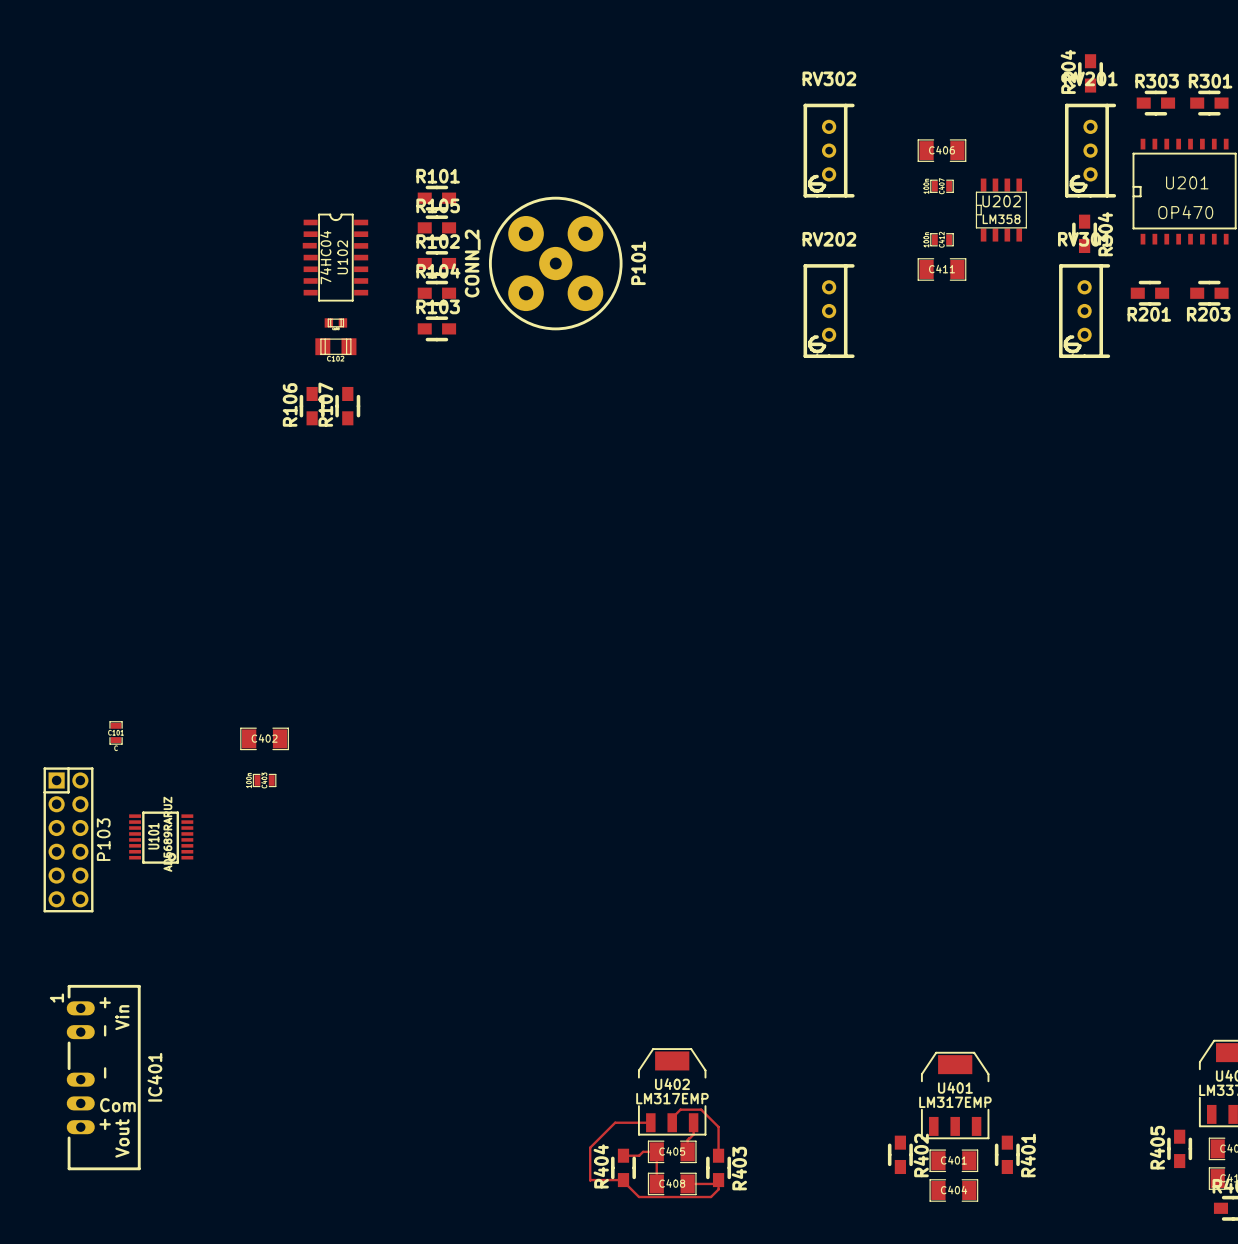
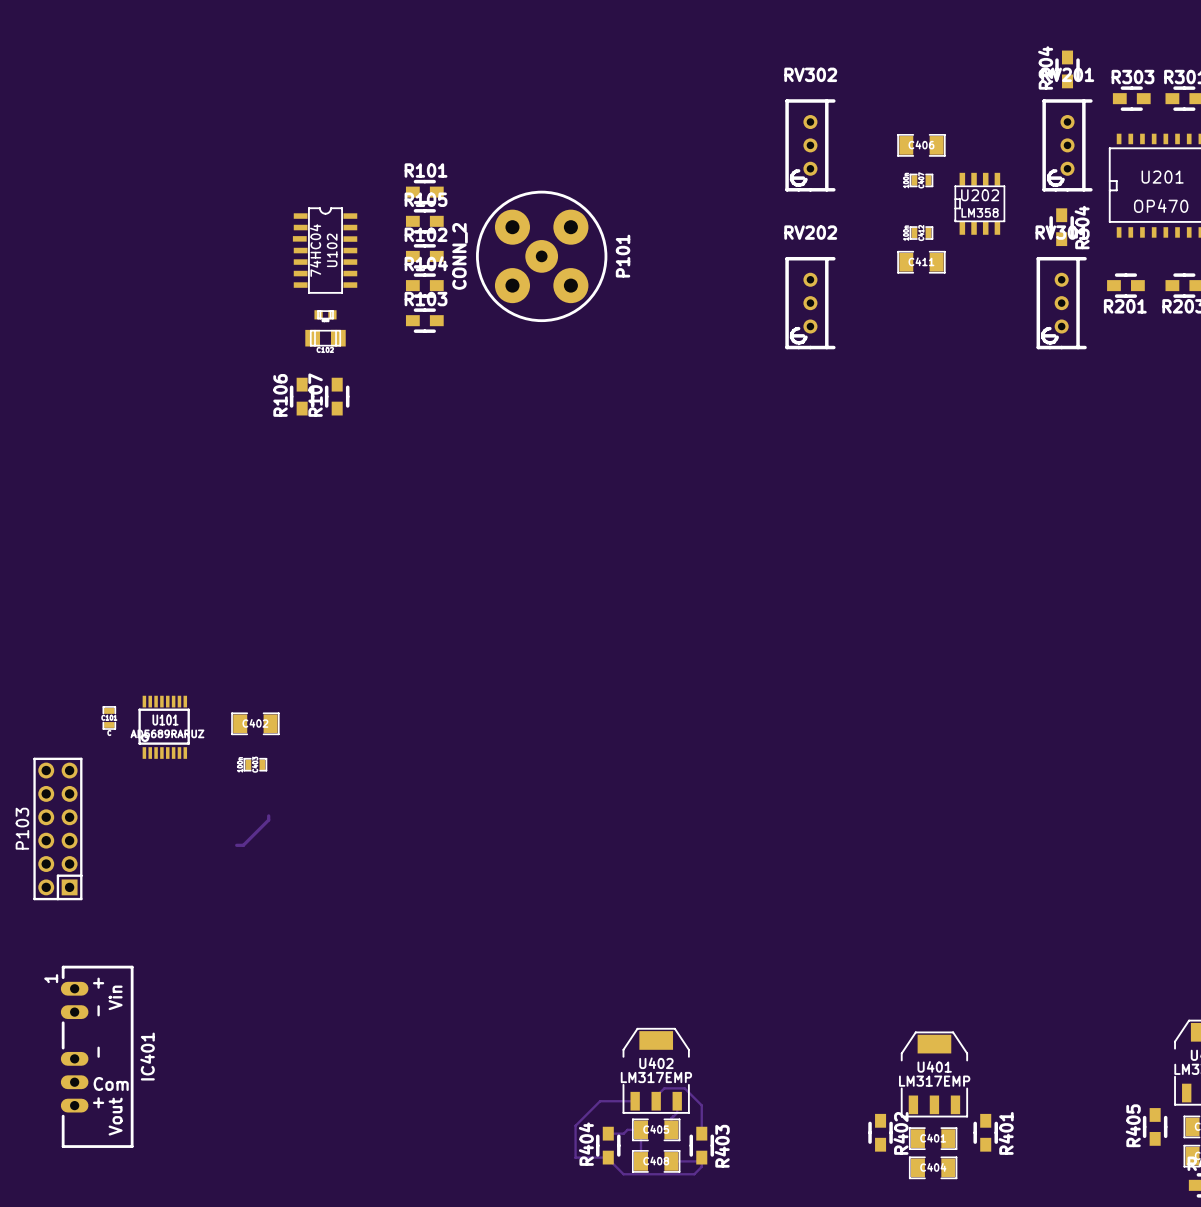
track: none -> (268, 815) (268, 820) (243, 845) (236, 845)
U101 rotation: 0° (161, 837) -> 90° clockwise (164, 727)
U101 position: (161, 837) -> (164, 727)
P103 rotation: 0° (68, 839) -> 180° (57, 828)

